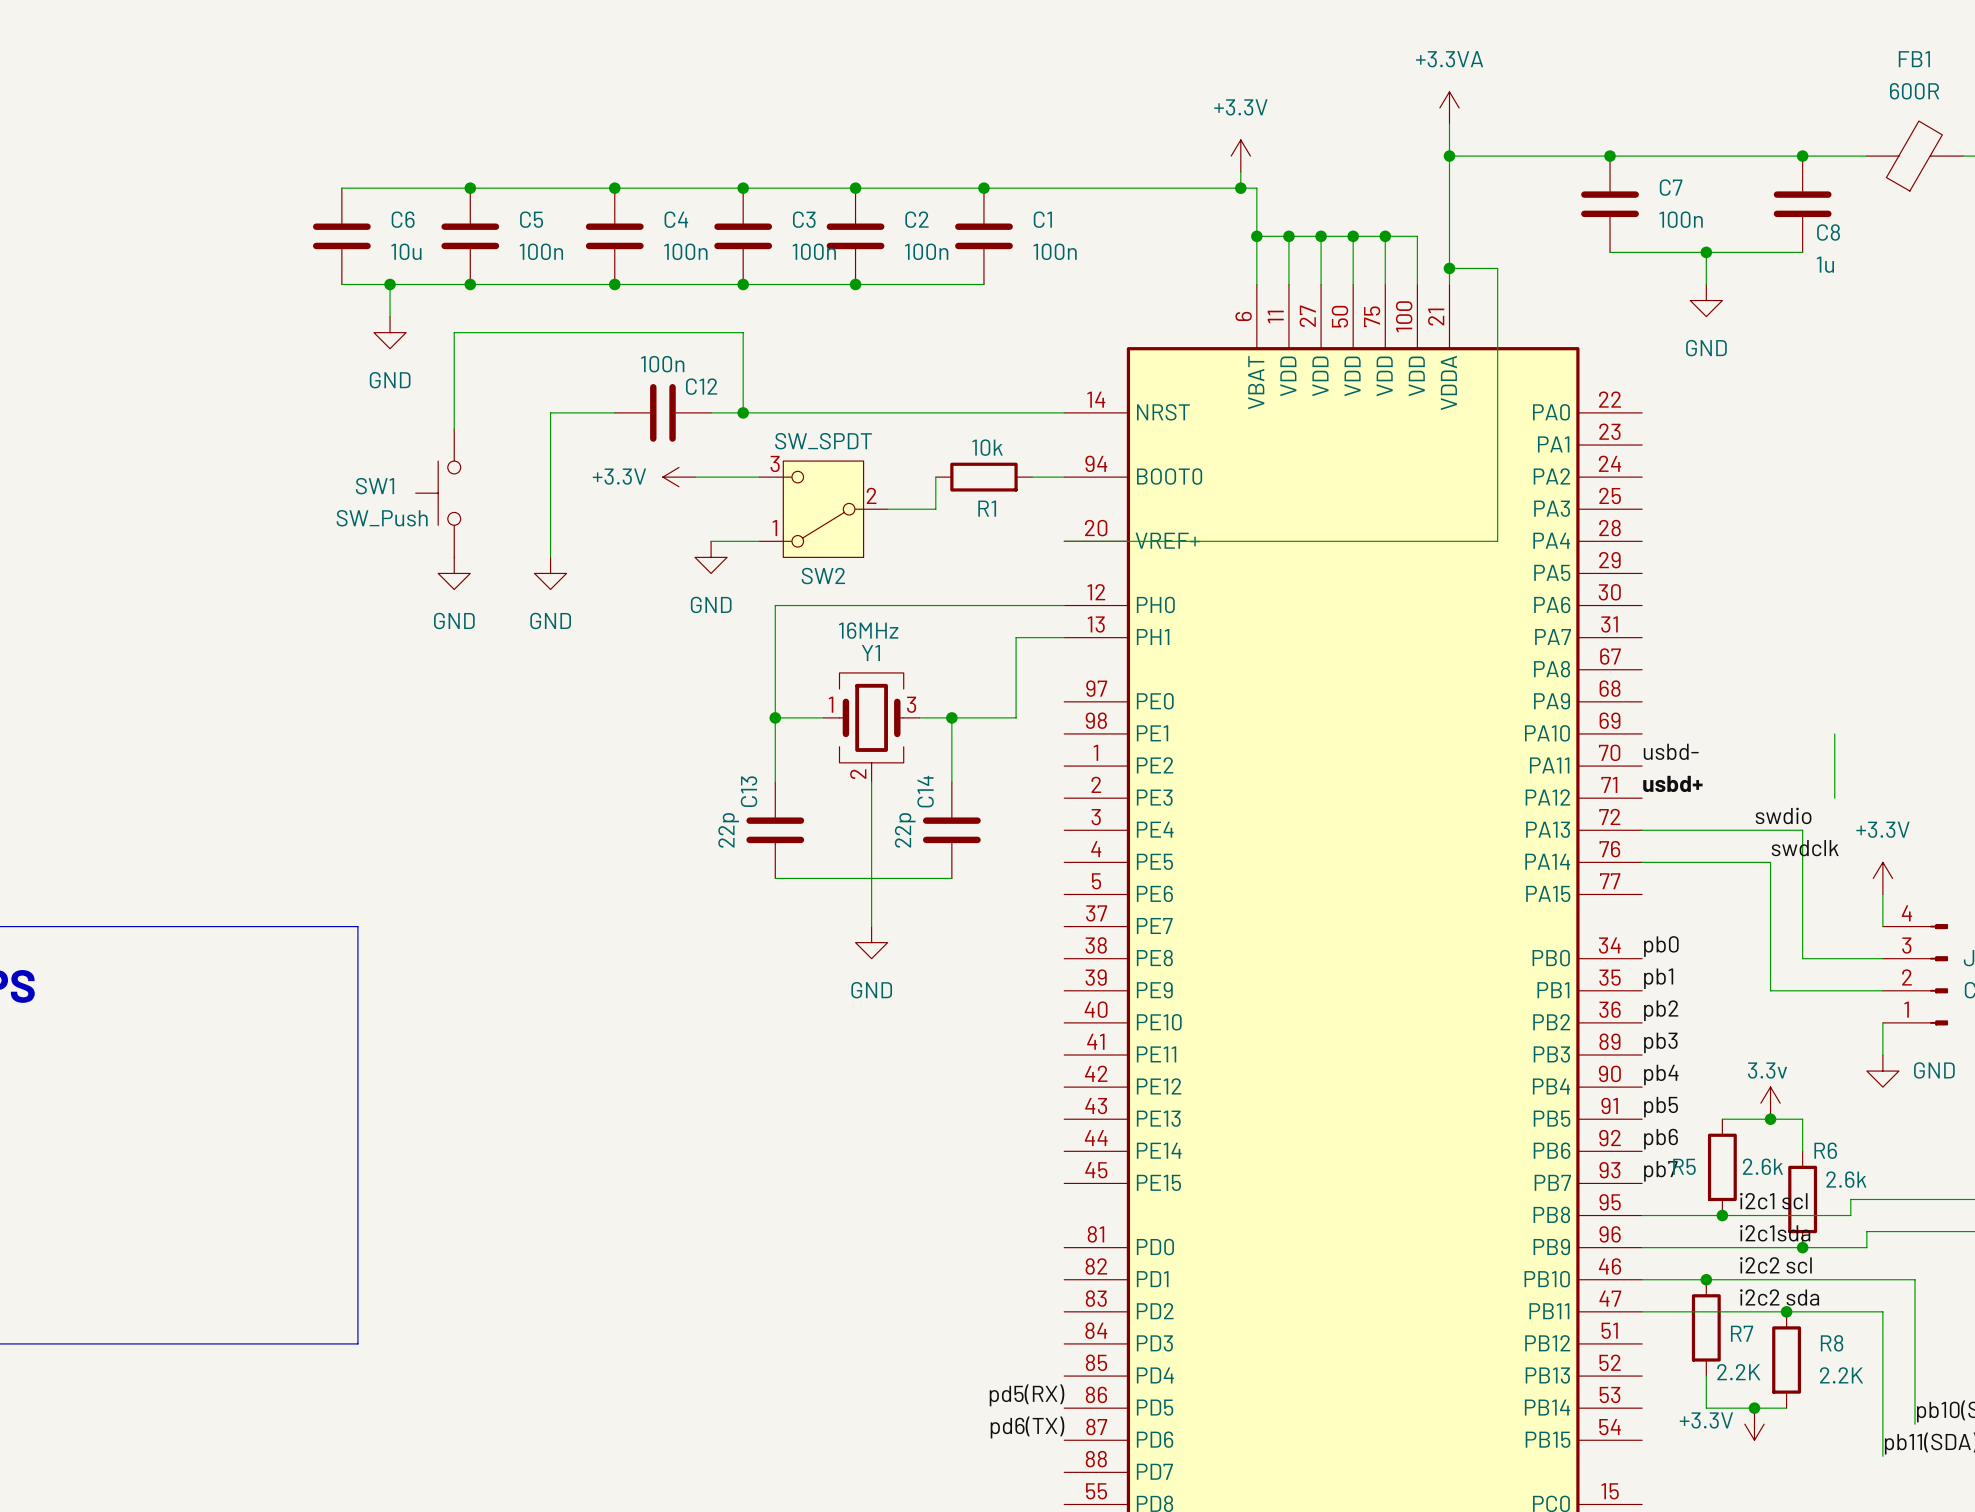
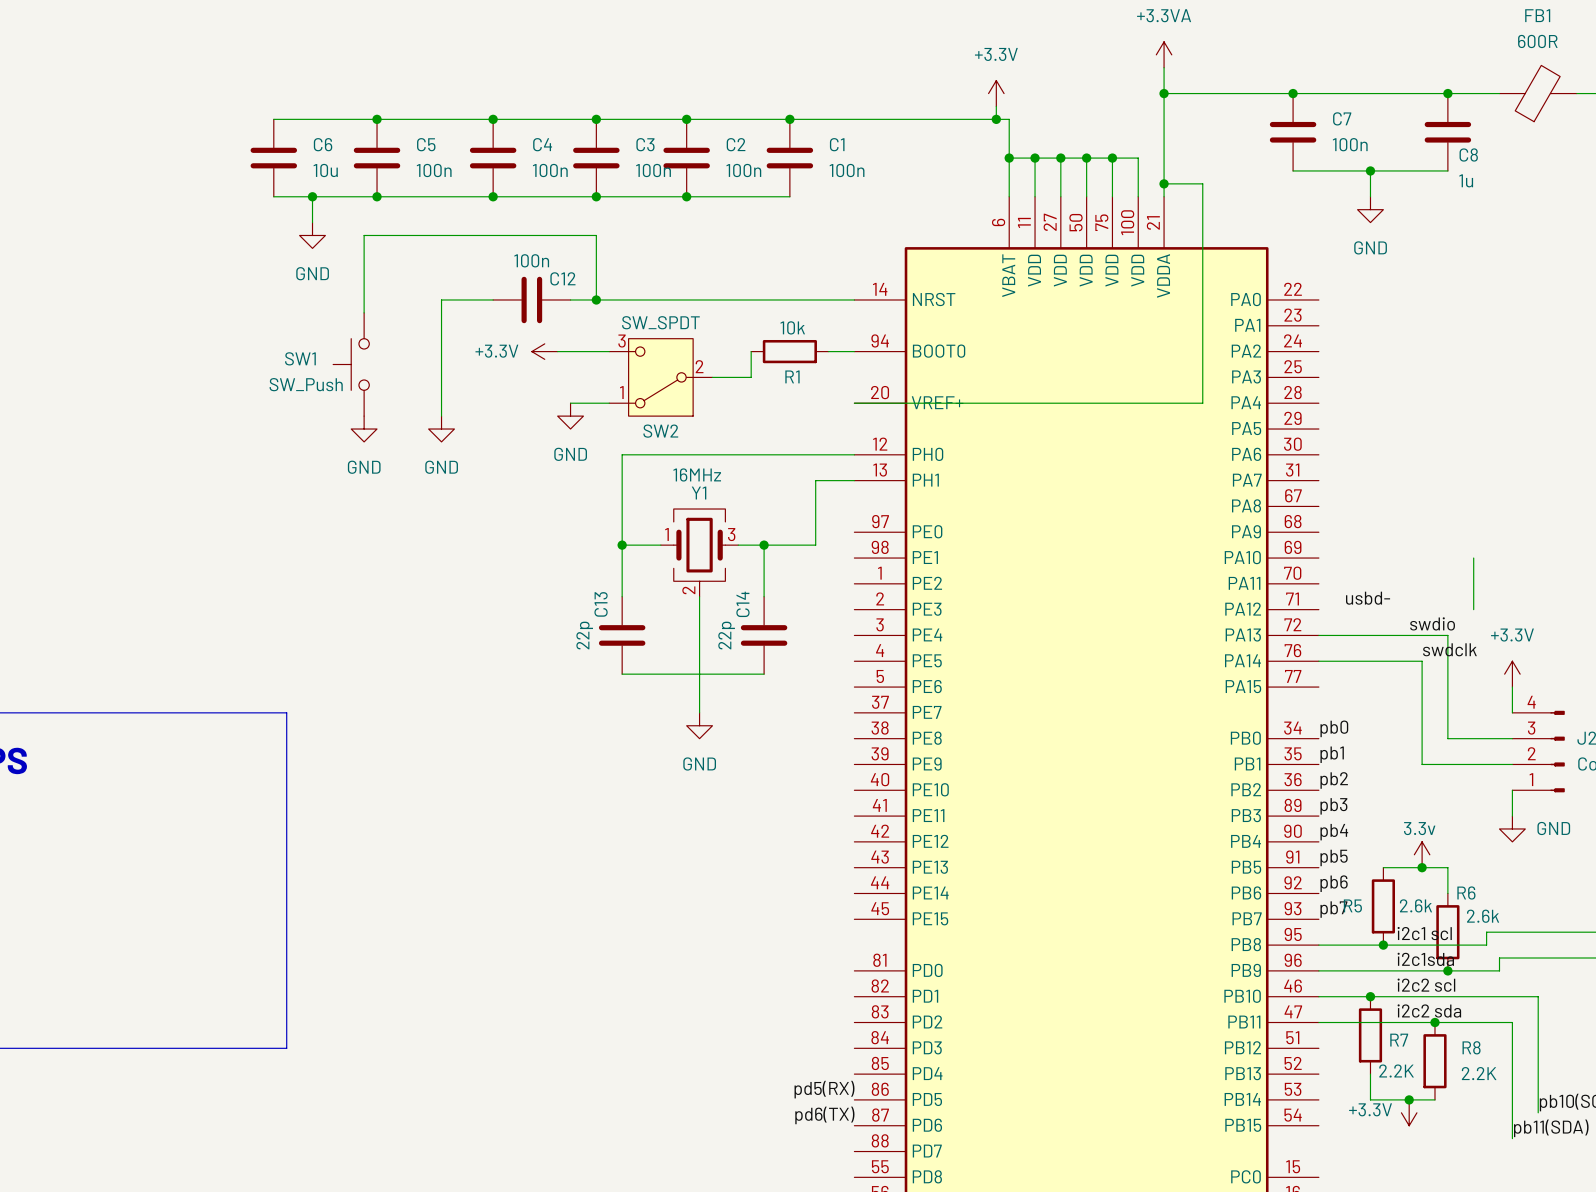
label position: usbd- (1671, 751) -> usbd- (1368, 598)
label: usbd+ (1672, 783) -> none

